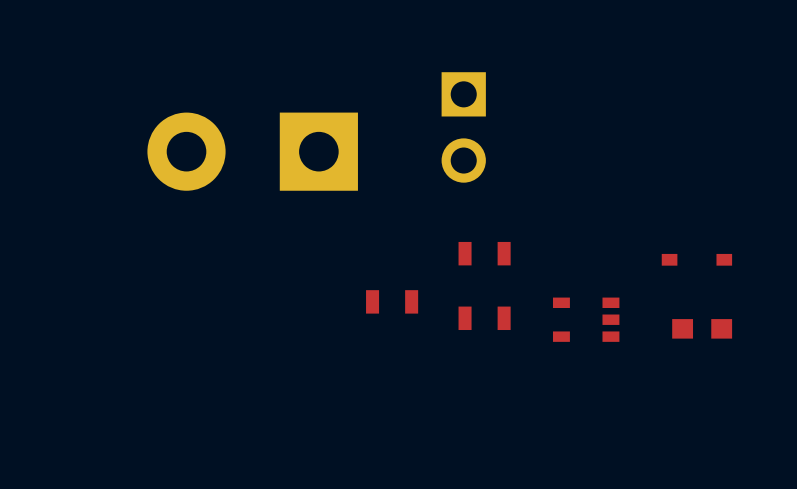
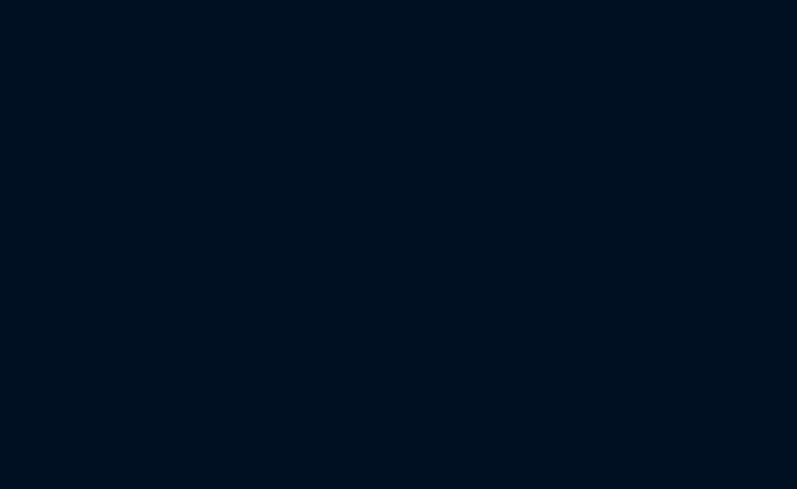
part: (463, 127) -> none
part: (252, 151) -> none
part: (484, 253) -> none
part: (696, 259) -> none
part: (392, 301) -> none
part: (484, 318) -> none
part: (586, 319) -> none
part: (702, 328) -> none

